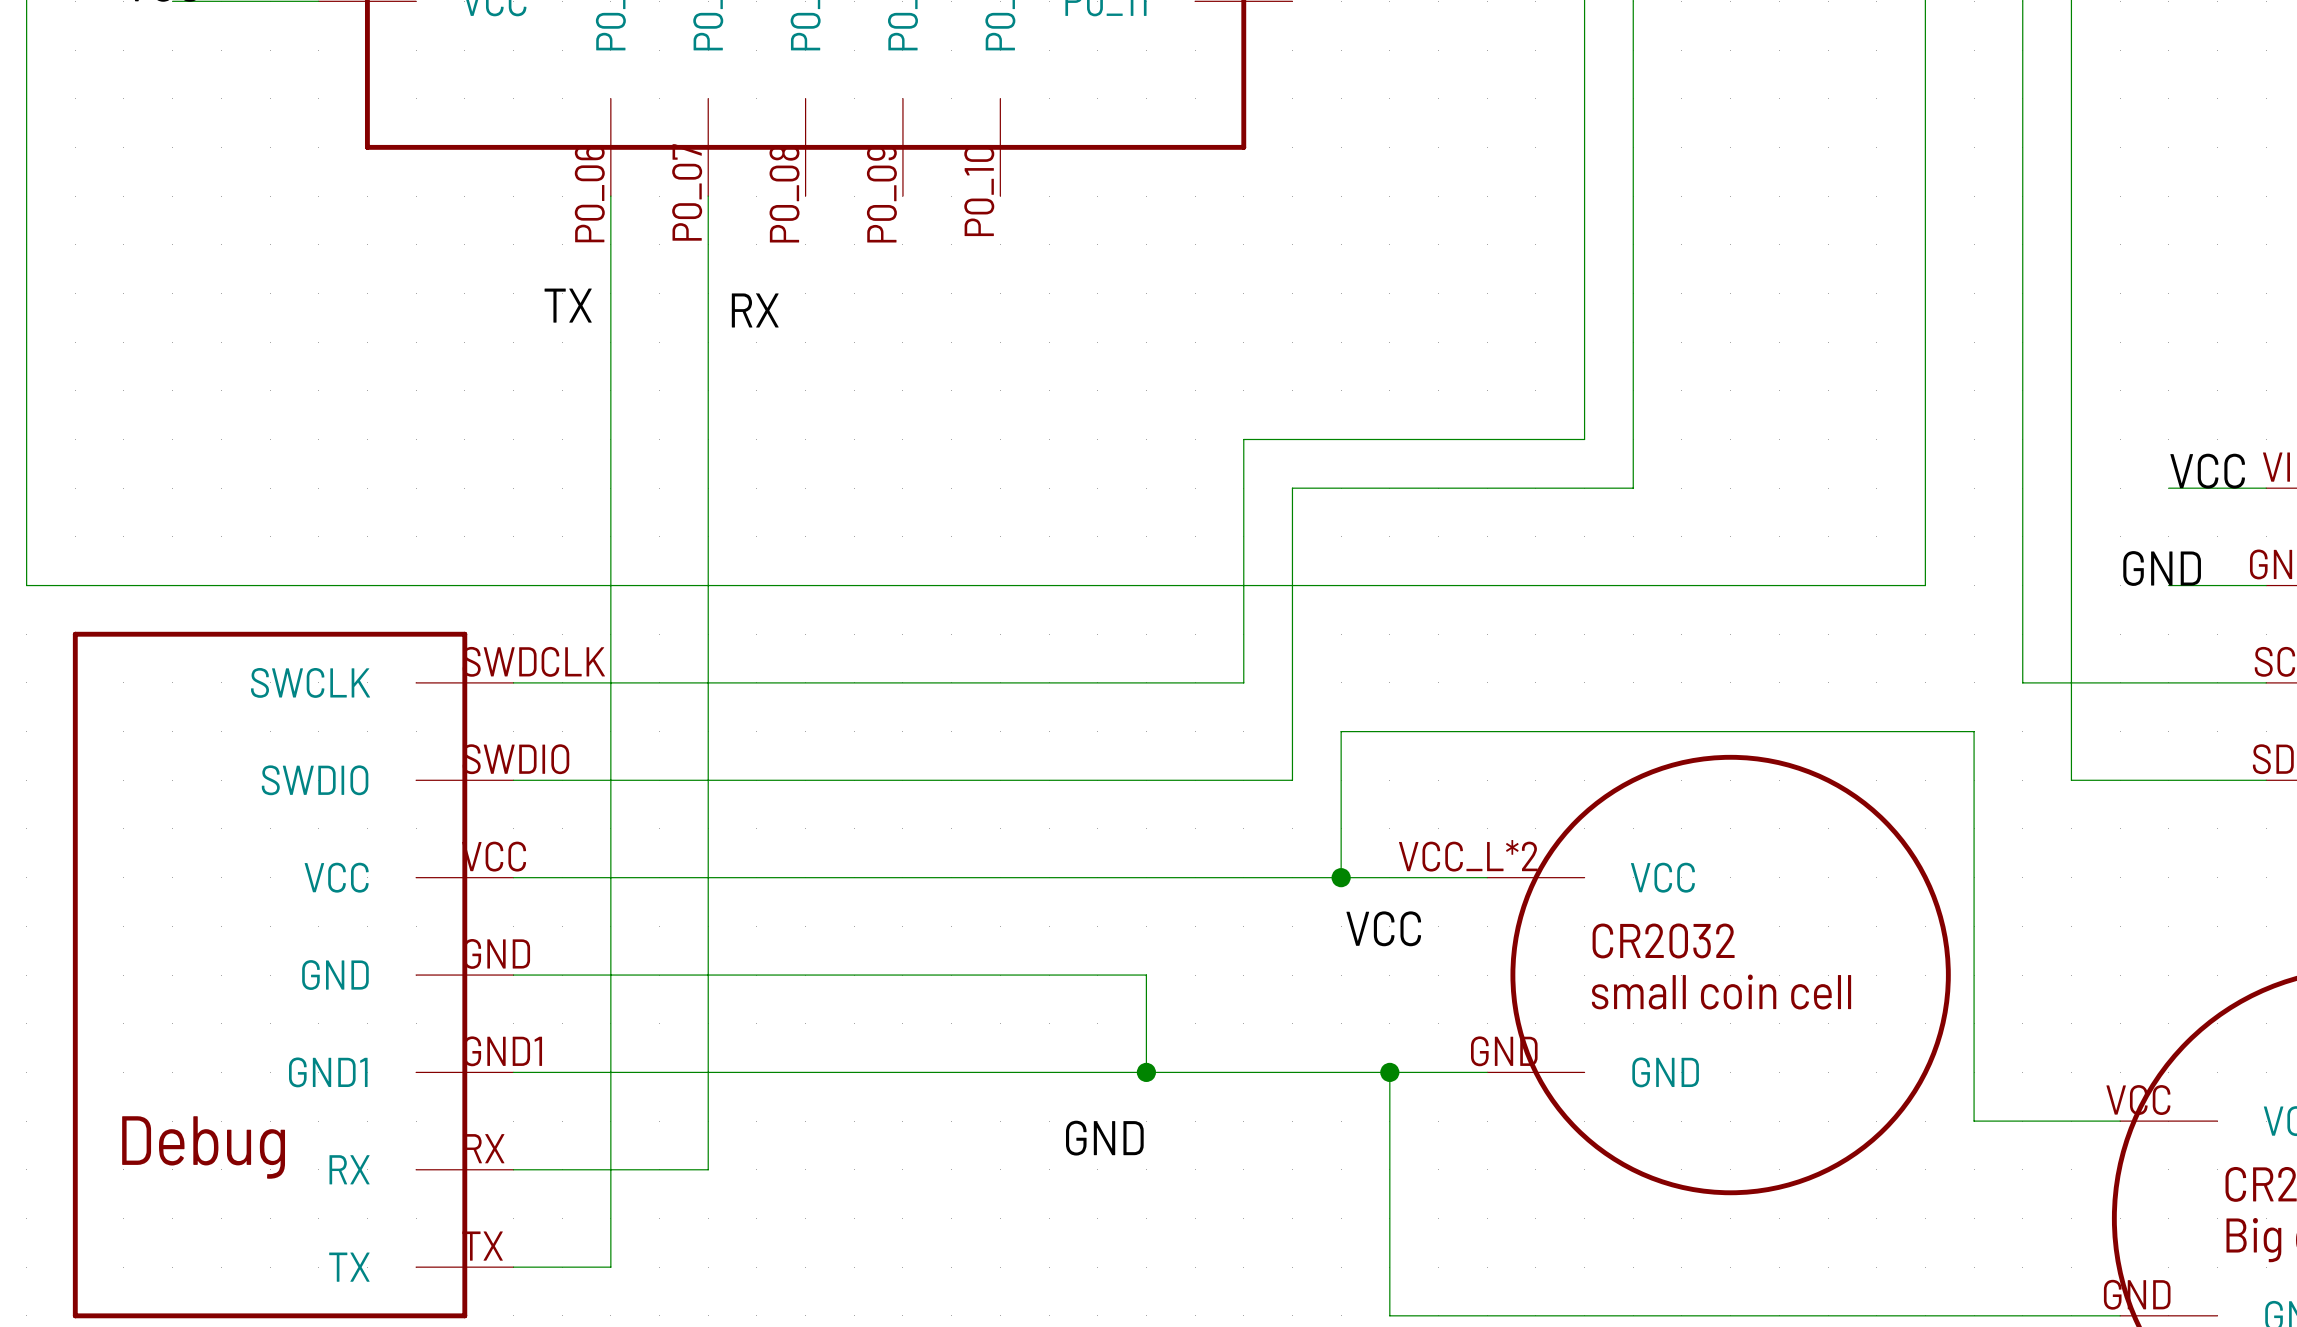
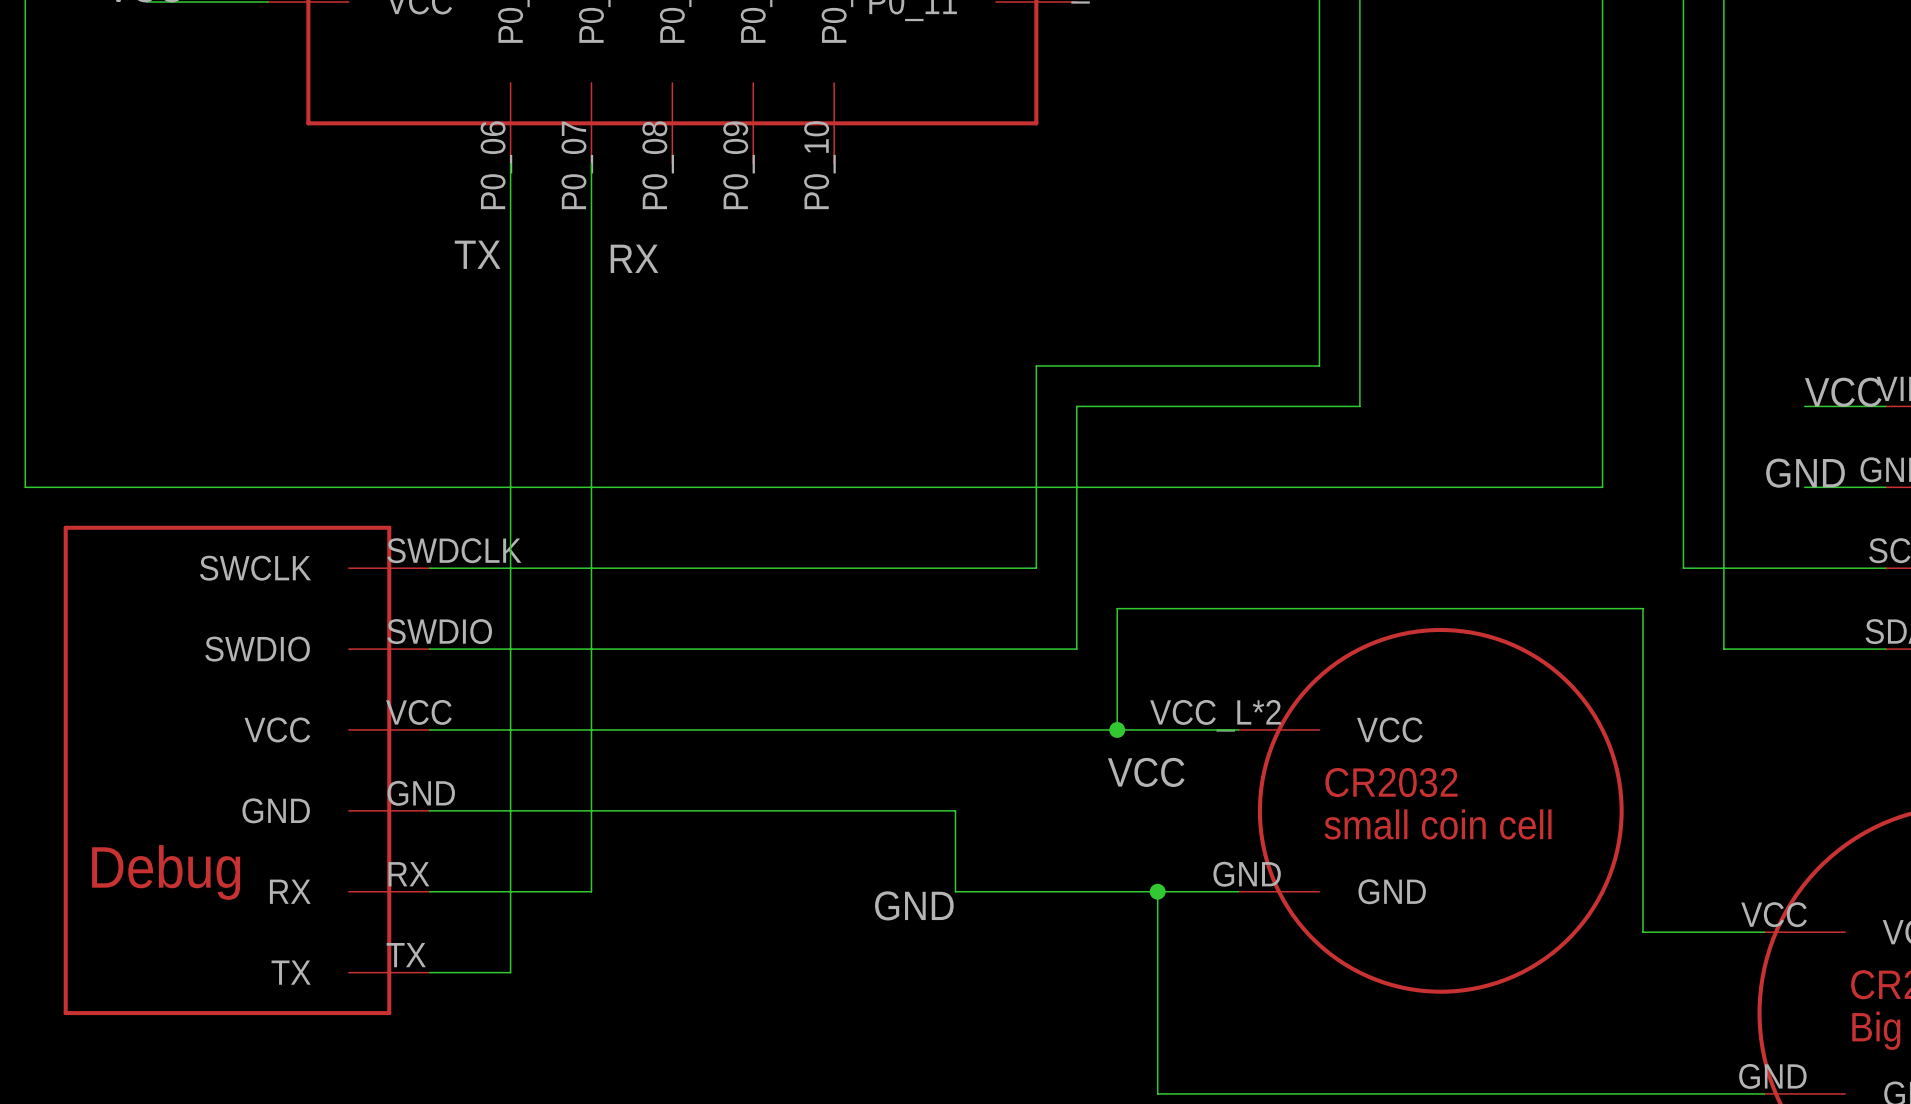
part: none -> (246, 770)
part: (293, 975) -> none
wire: (1146, 1072) (708, 1072) (708, 1169) (610, 1169) (610, 1267) (513, 1267) -> none
junction: (1146, 1072) -> none
label position: GND (1104, 1138) -> GND (914, 905)

